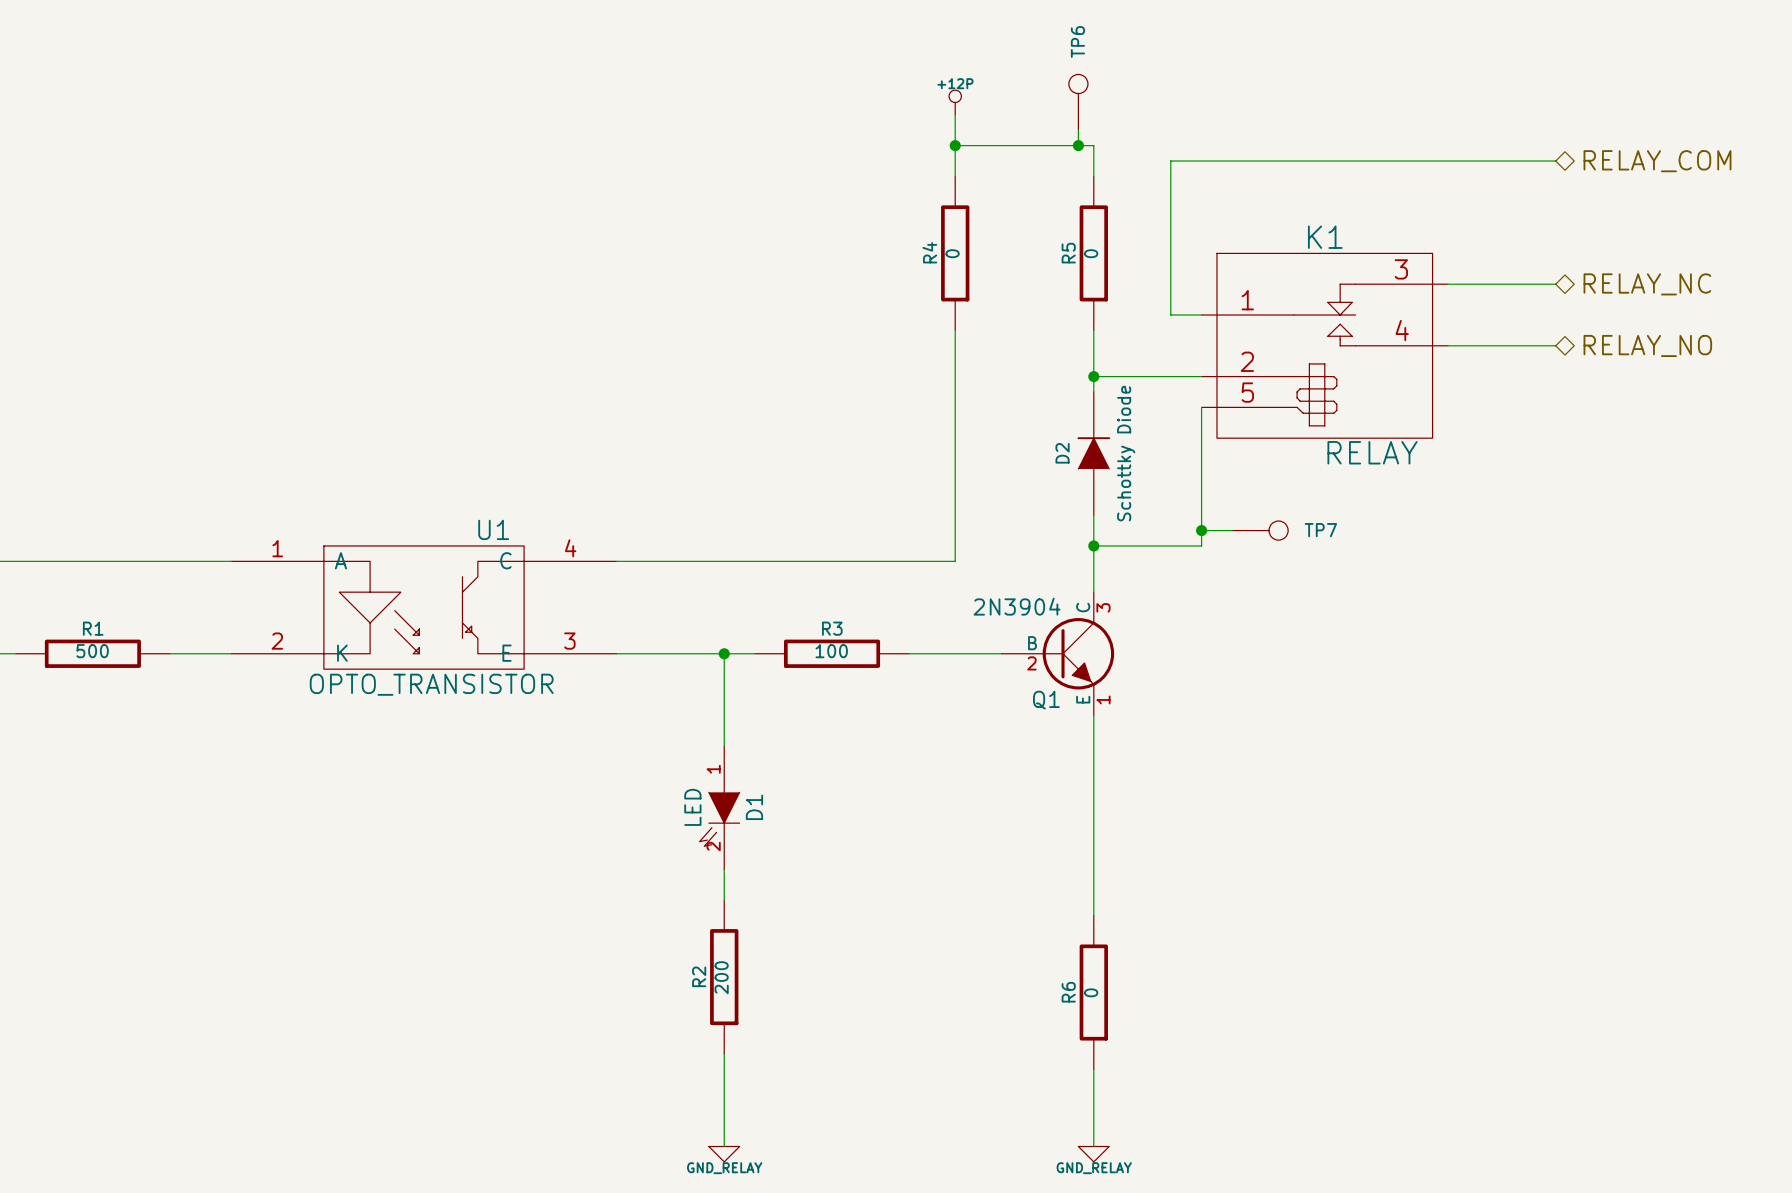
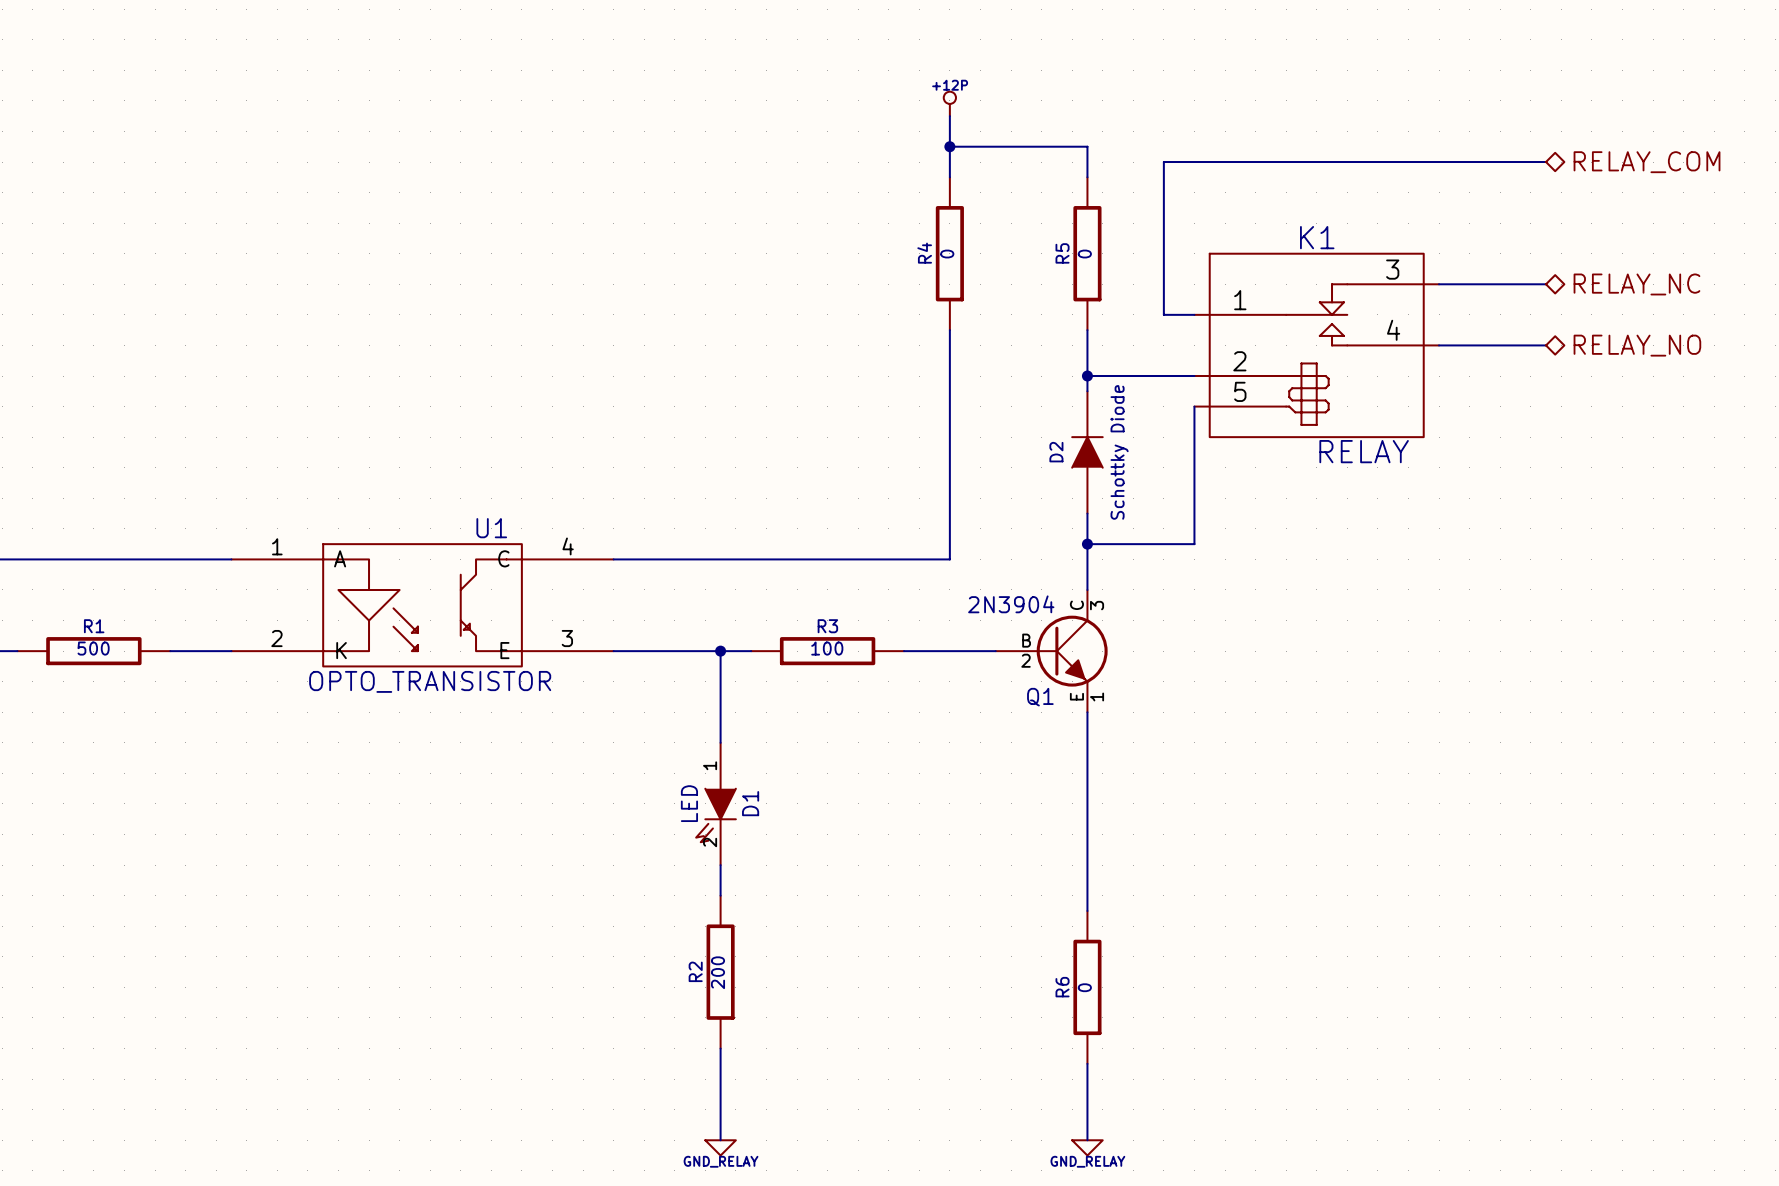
TP6: (1078, 102) -> none
wire: (1078, 130) (1078, 145) -> none
junction: (1078, 145) -> none
wire: (1201, 530) (1232, 530) -> none
junction: (1201, 530) -> none
TP7: (1260, 530) -> none

